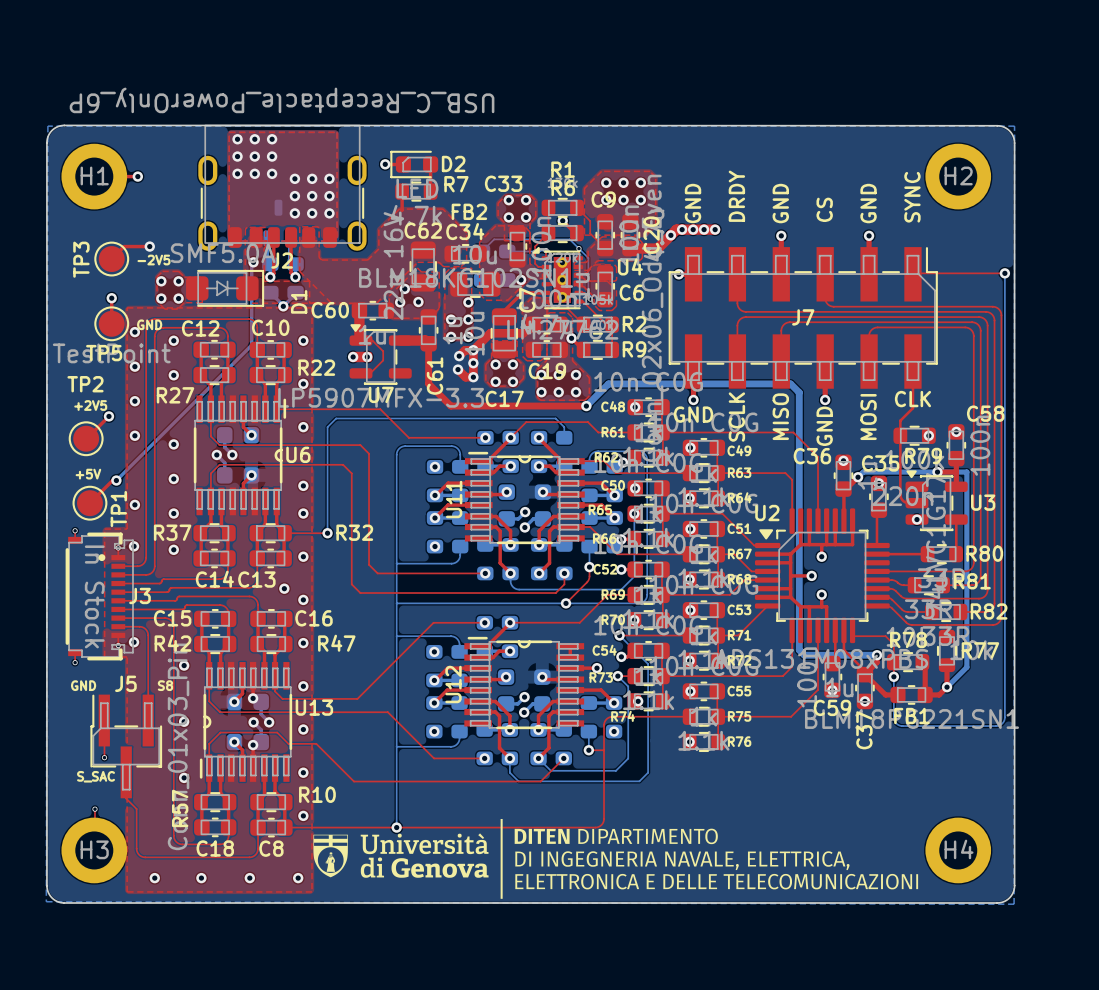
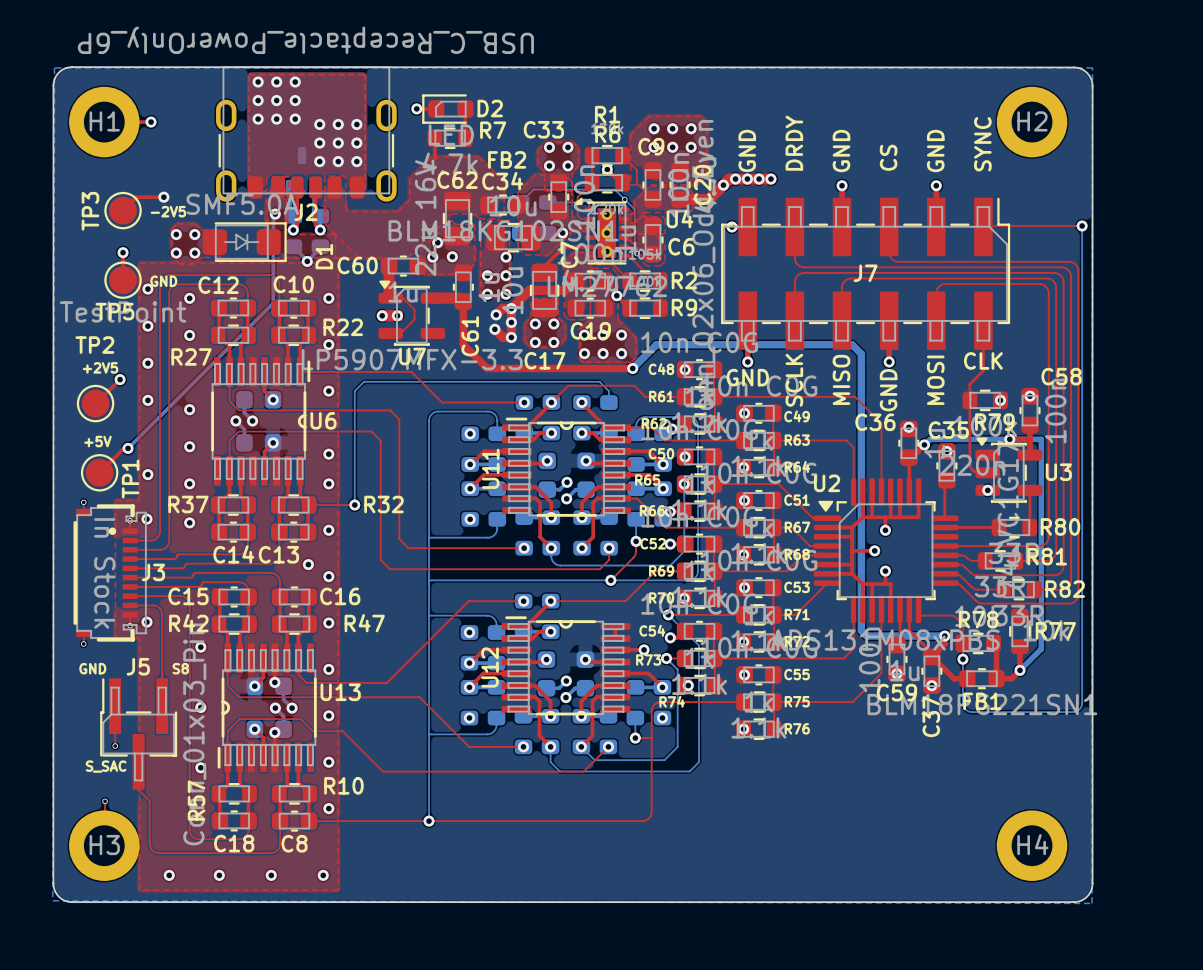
drawing: [313, 818, 919, 899] -> none

